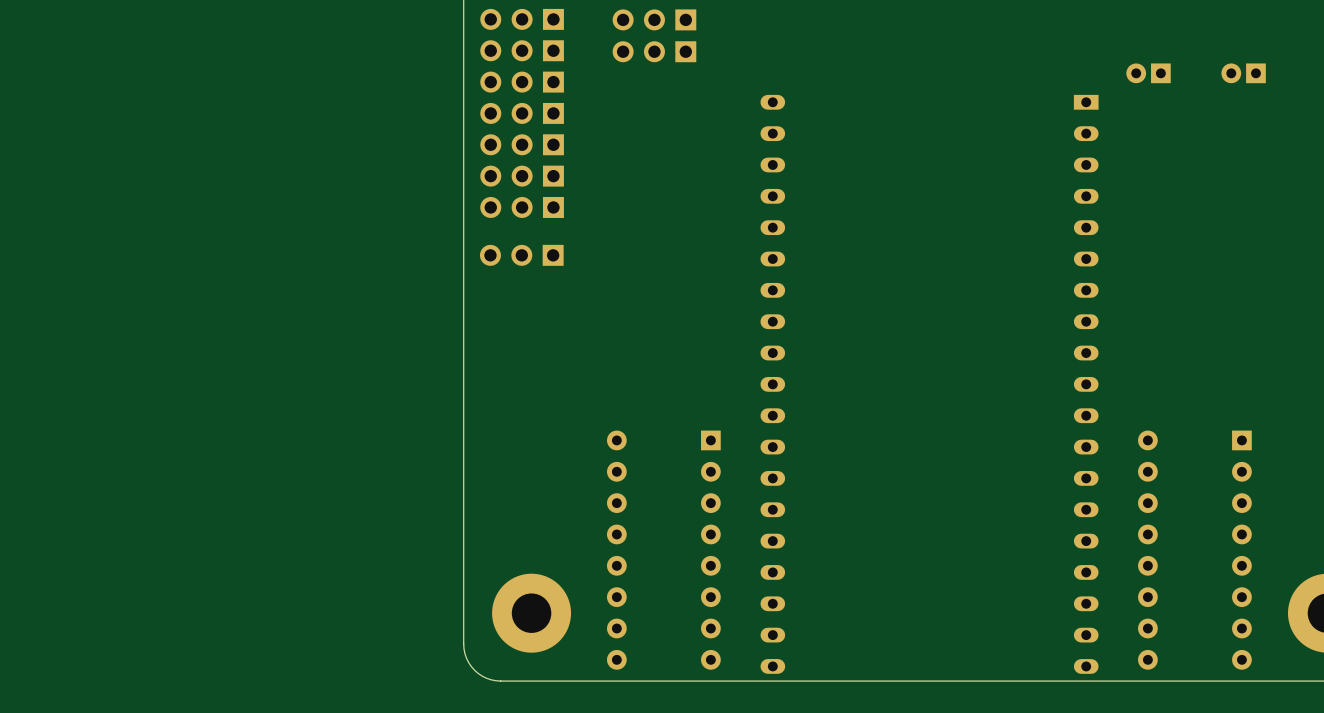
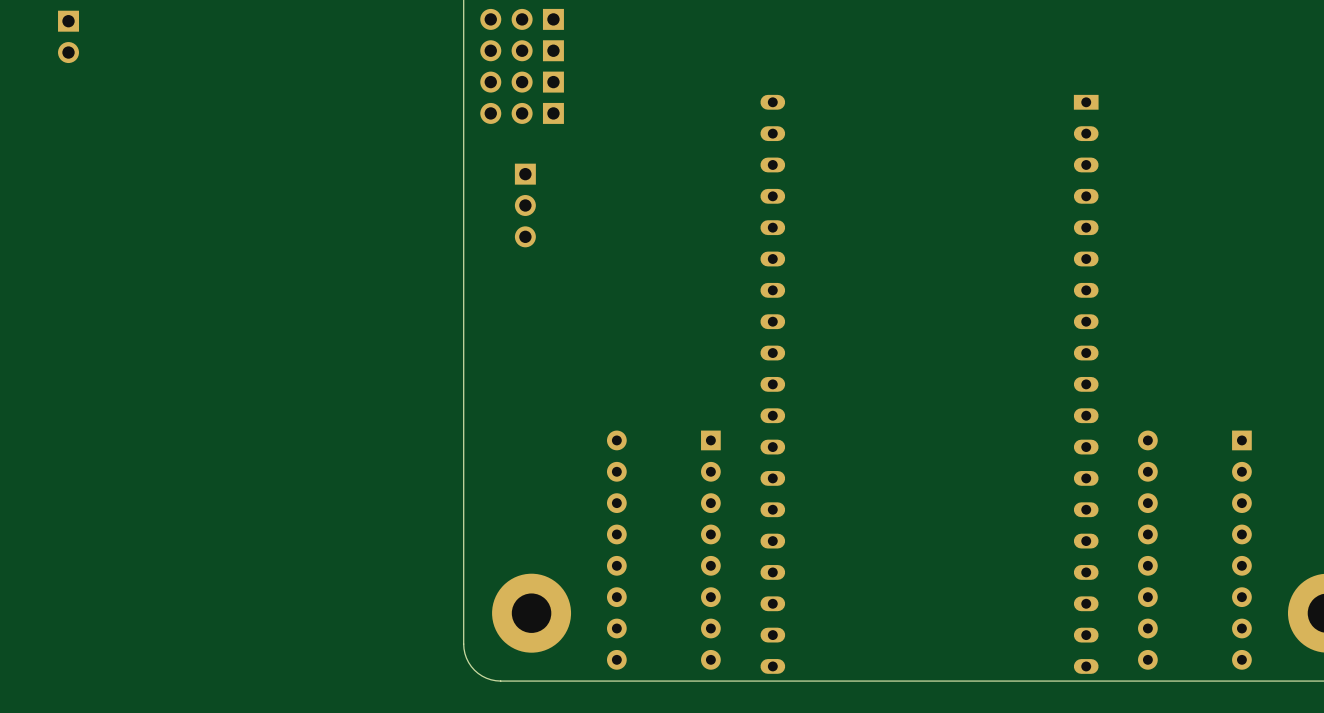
part: (654, 19) -> none
part: none -> (68, 36)
part: (654, 51) -> none
part: (1148, 73) -> none
part: (1243, 73) -> none
part: (522, 144) -> none
part: (522, 176) -> none
part rotation: 0° (522, 207) -> 90° counterclockwise (525, 205)
part: (521, 255) -> none

